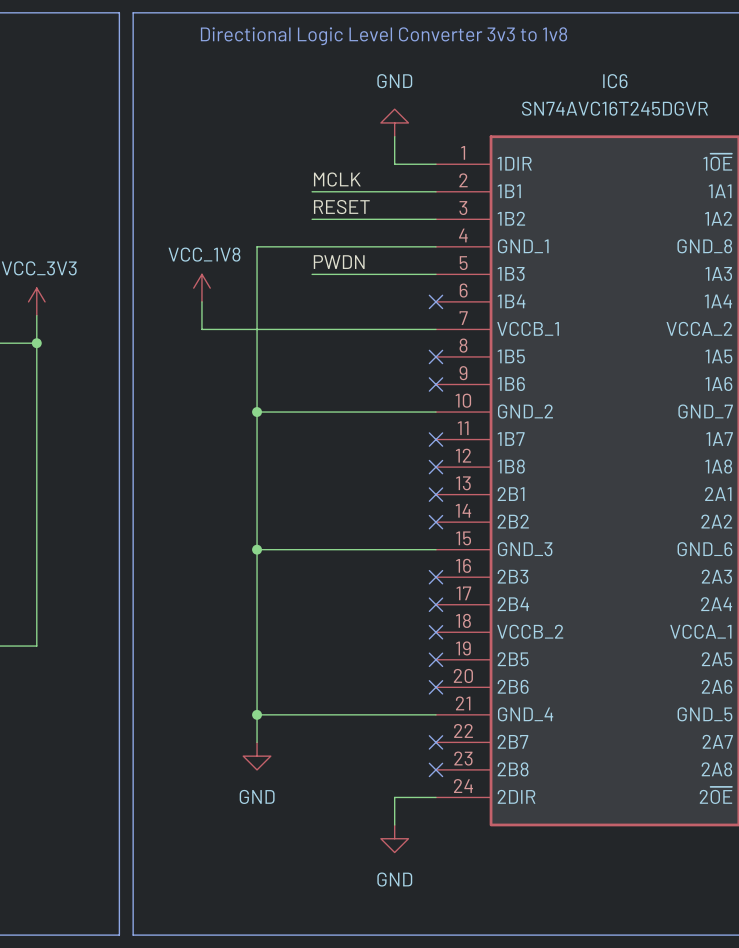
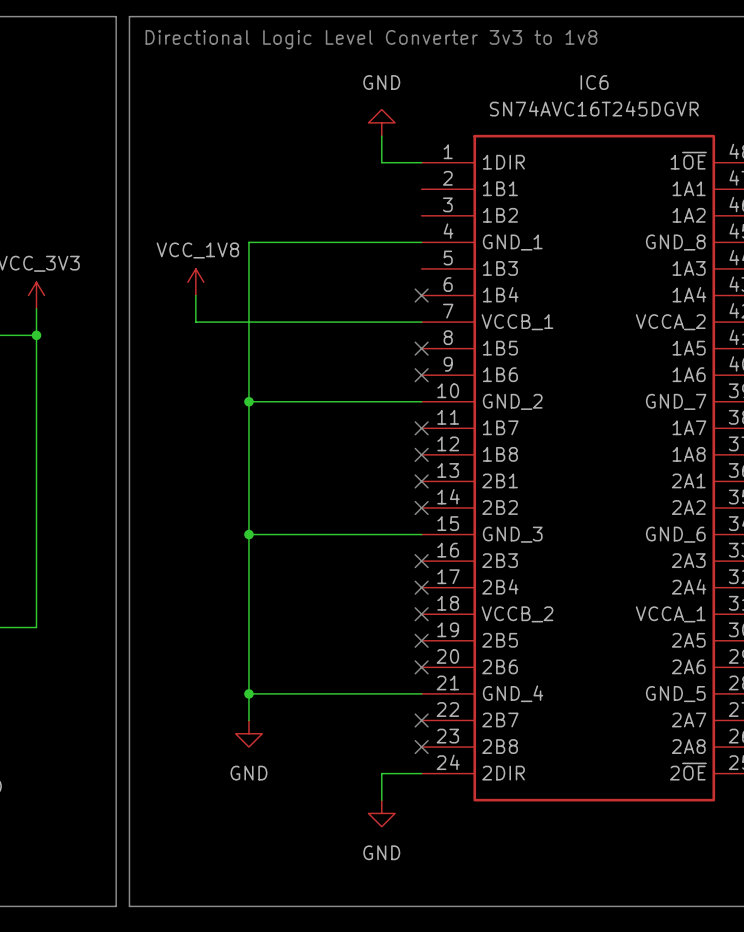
label: MCLK (337, 179) -> none
wire: (312, 191) (435, 191) -> none
label: RESET (341, 207) -> none
wire: (312, 219) (435, 219) -> none
label: PWDN (339, 262) -> none
wire: (312, 274) (435, 274) -> none

